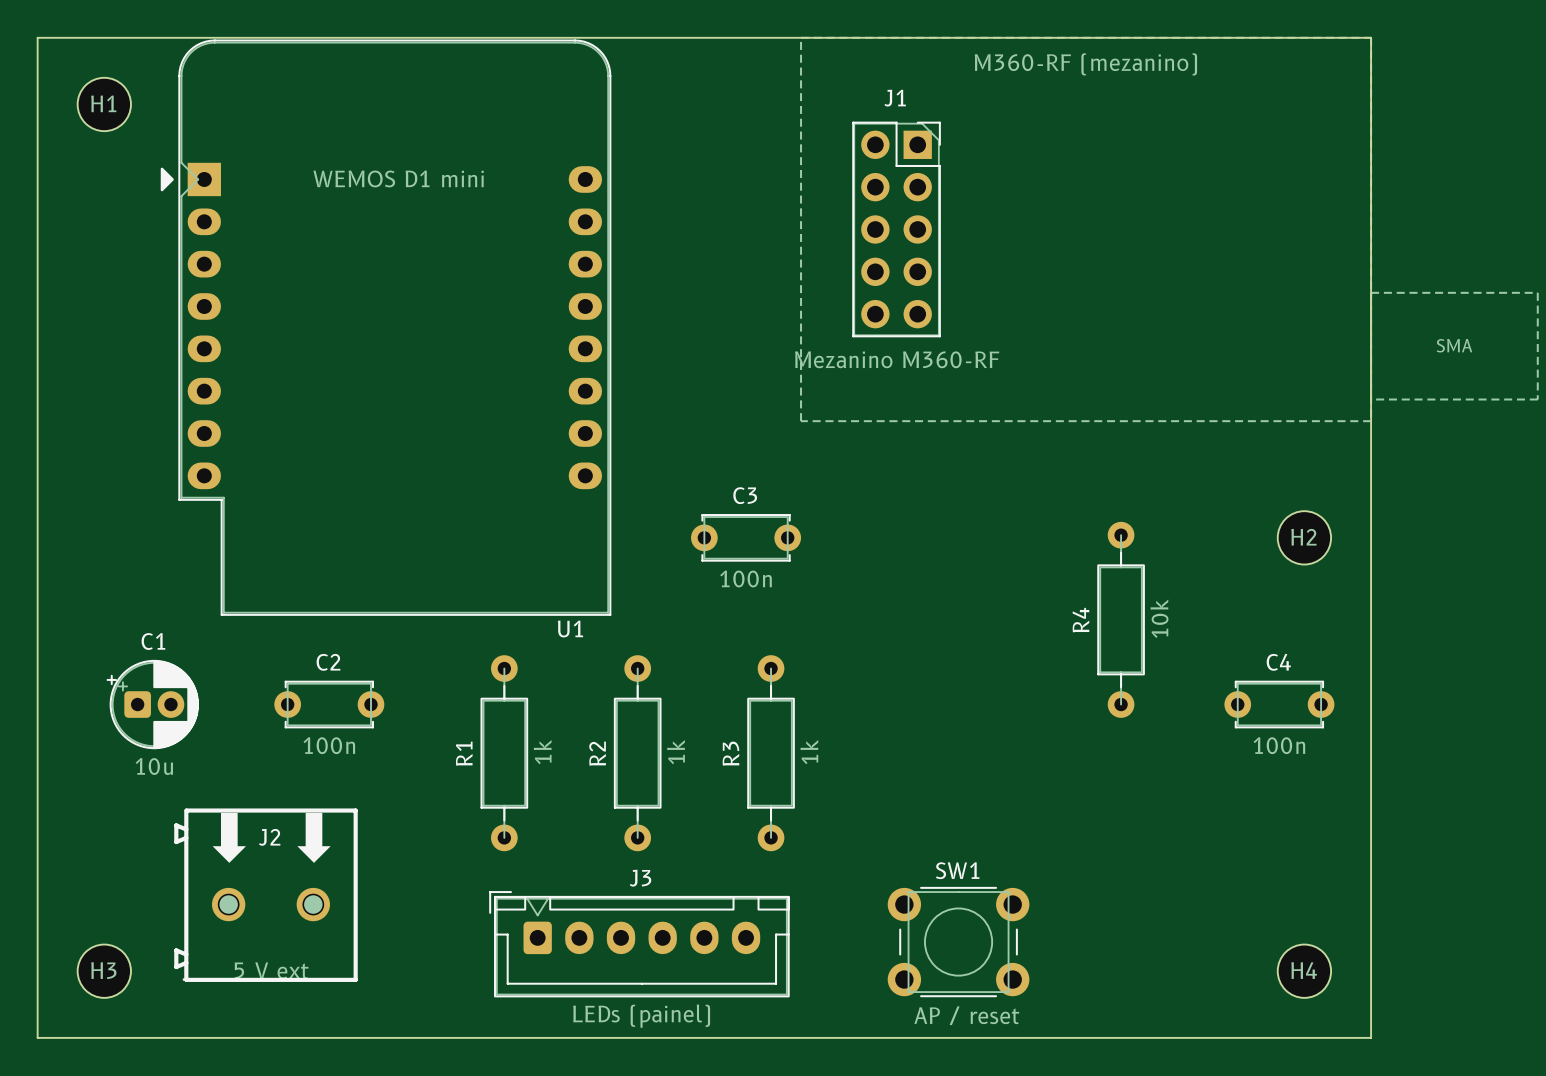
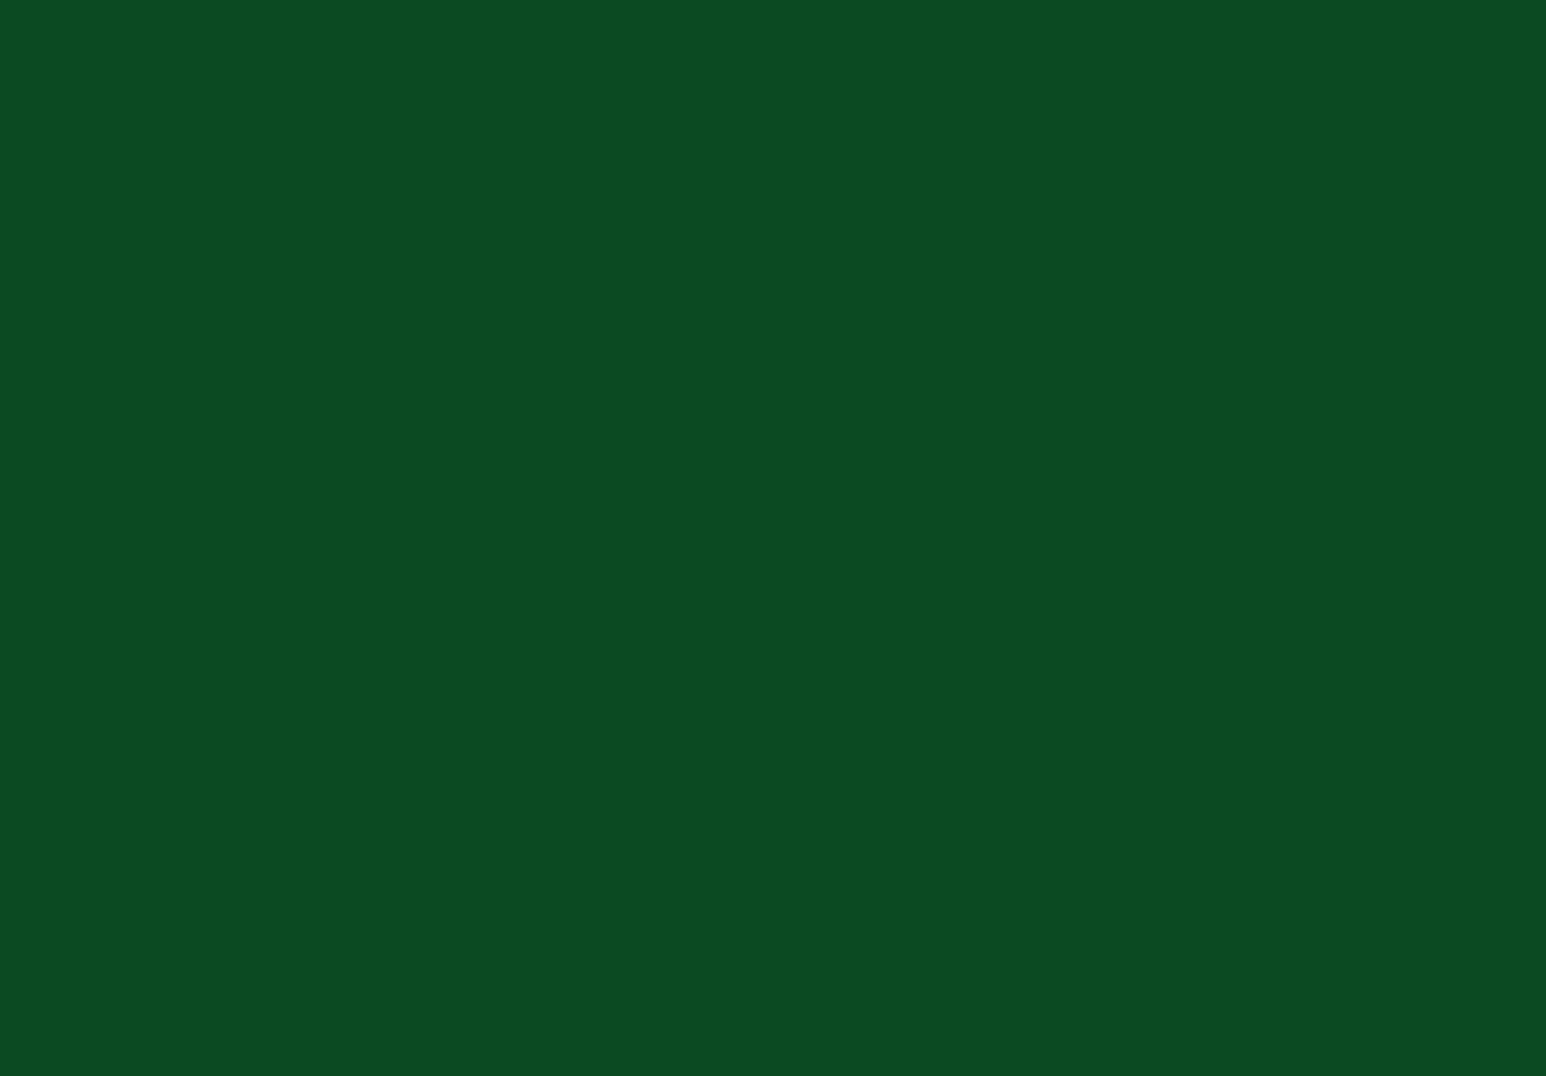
board edge: (37, 37) (1371, 37) (1371, 1037) (37, 1037) (37, 37) -> none
H1: (104, 104) -> none
J1: Mezanino M360-RF (1169, 229) -> none
U1: WEMOS D1 mini (386, 327) -> none
C3: 100n (746, 537) -> none
H2: (1304, 537) -> none
R4: 10k (1121, 619) -> none
C1: 10u (152, 704) -> none
C2: 100n (329, 704) -> none
C4: 100n (1279, 704) -> none
R1: 1k (504, 753) -> none
R2: 1k (637, 753) -> none
R3: 1k (771, 753) -> none
J2: 5 V ext (265, 895) -> none
SW1: AP / reset (958, 942) -> none
J3: LEDs (painel) (639, 944) -> none
H3: (104, 971) -> none
H4: (1304, 971) -> none

